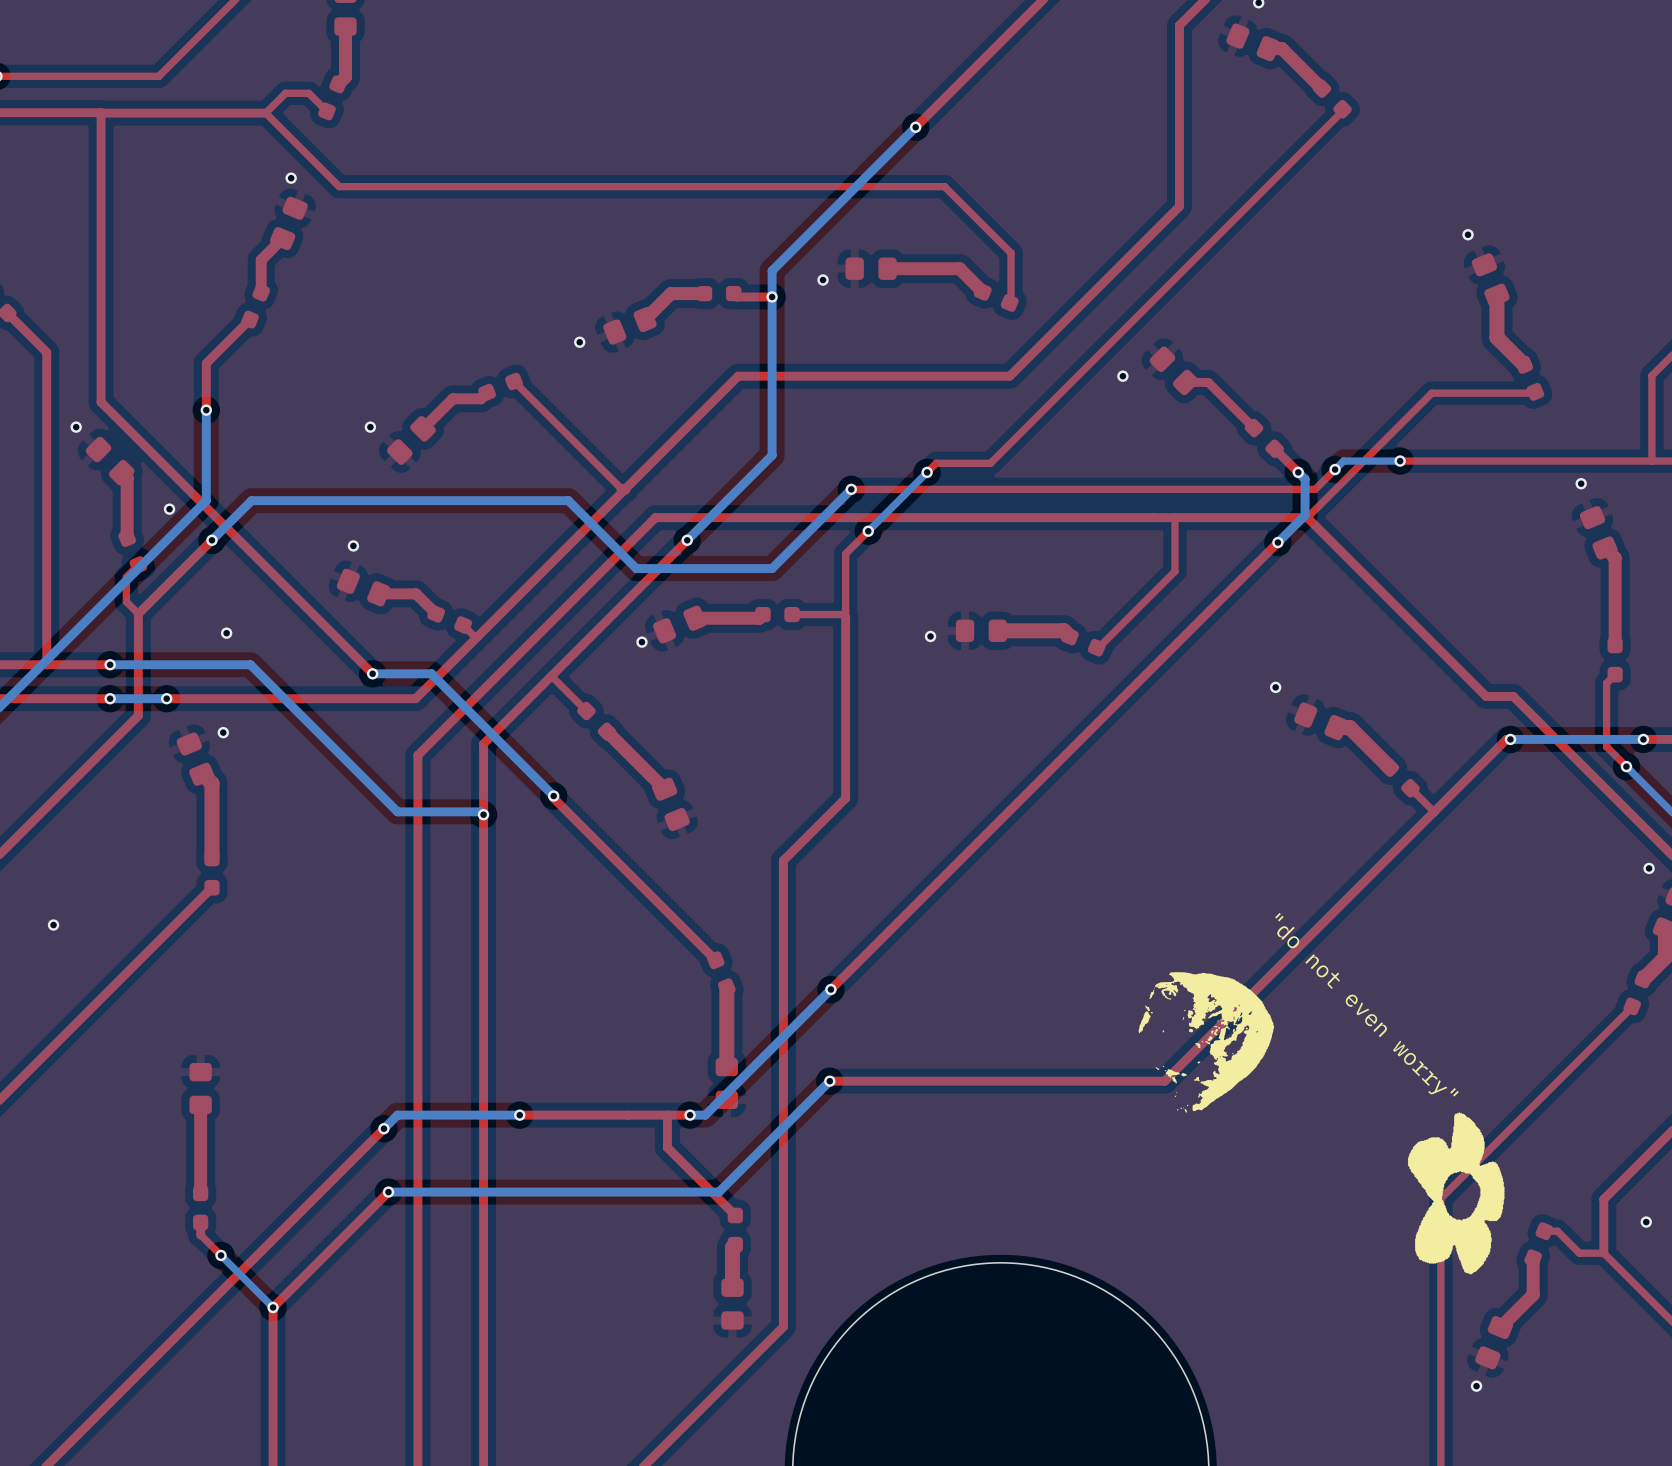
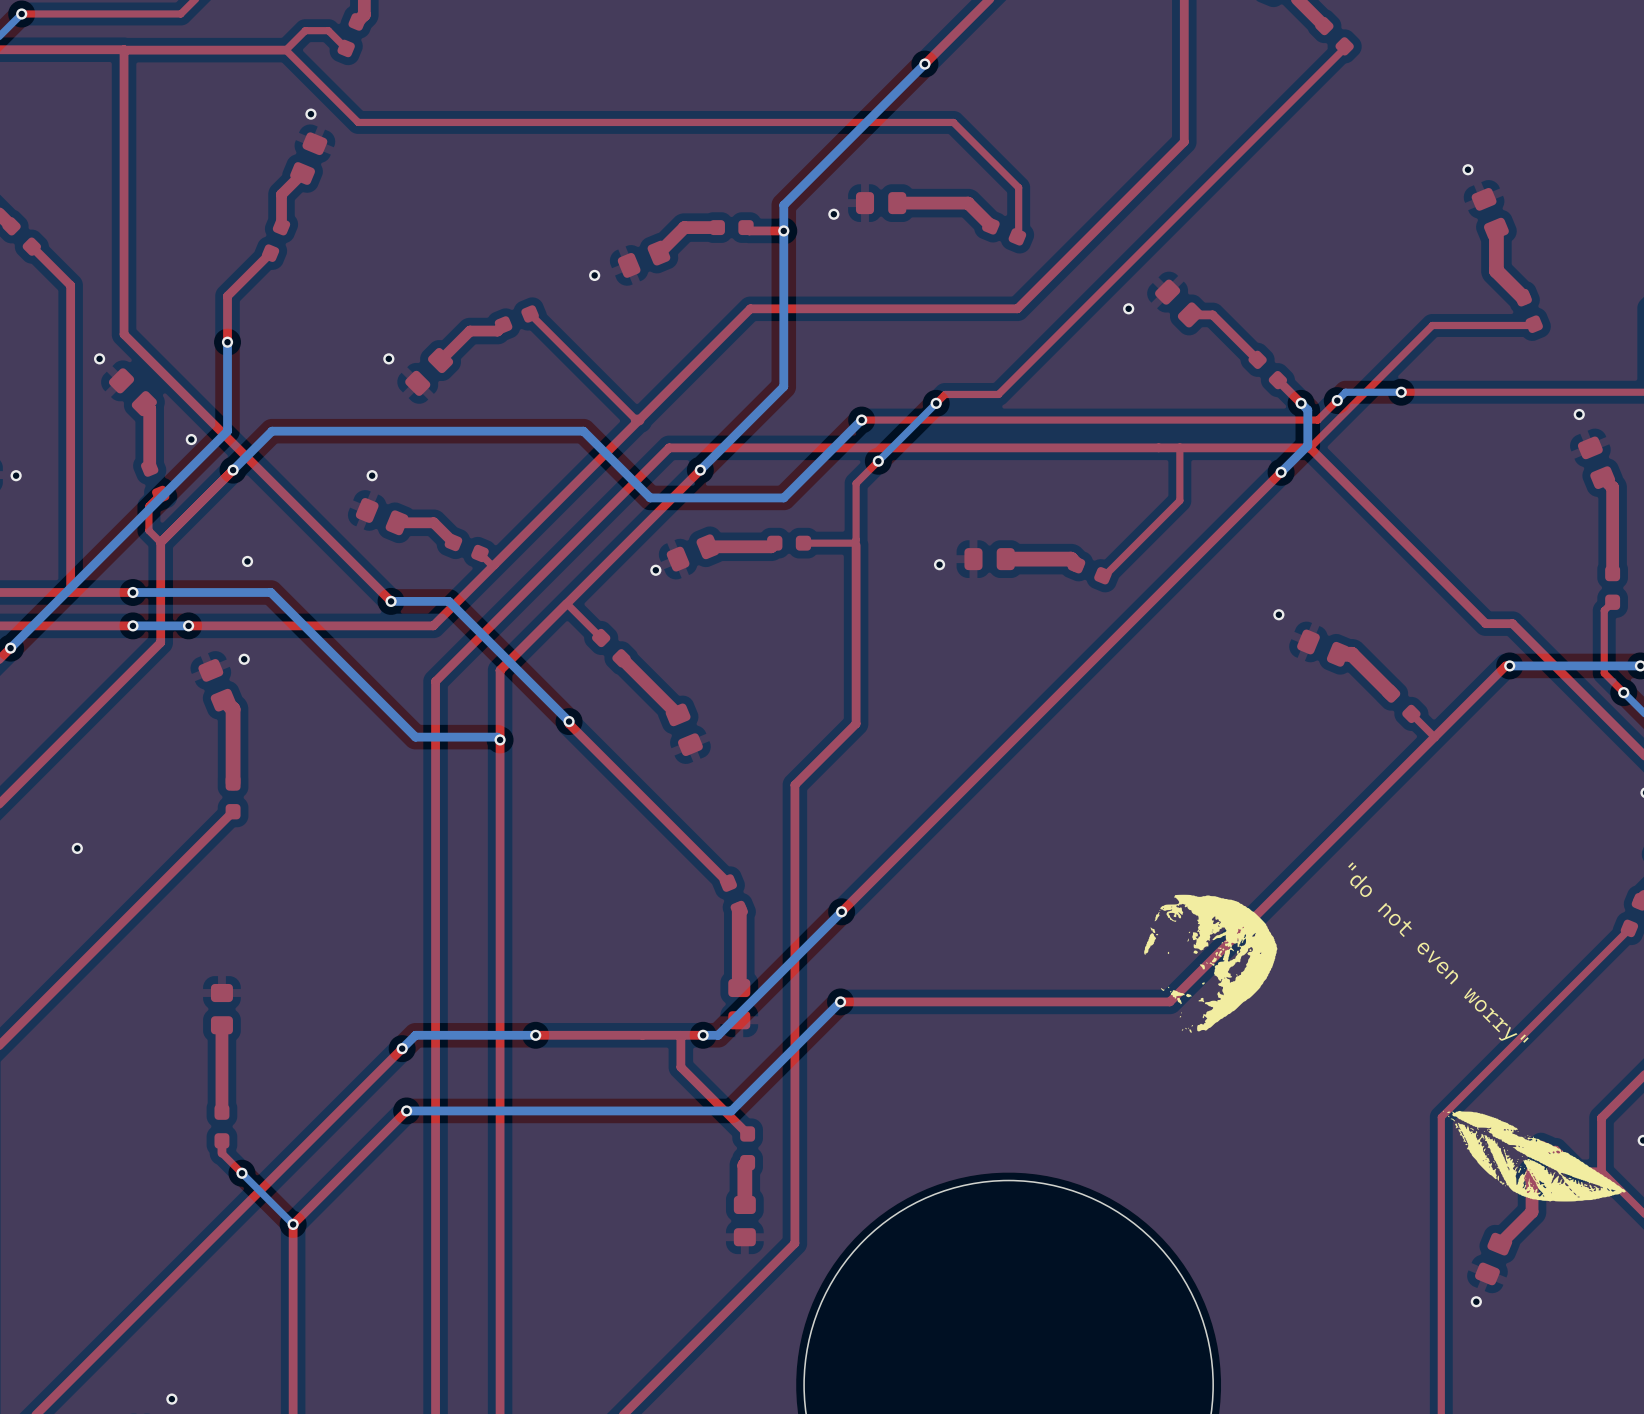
text position: "do not even worry" (1366, 1004) -> "do not even worry" (1438, 952)
drawing: [1407, 1112, 1505, 1275] -> none
drawing: none -> [1443, 1110, 1626, 1202]

